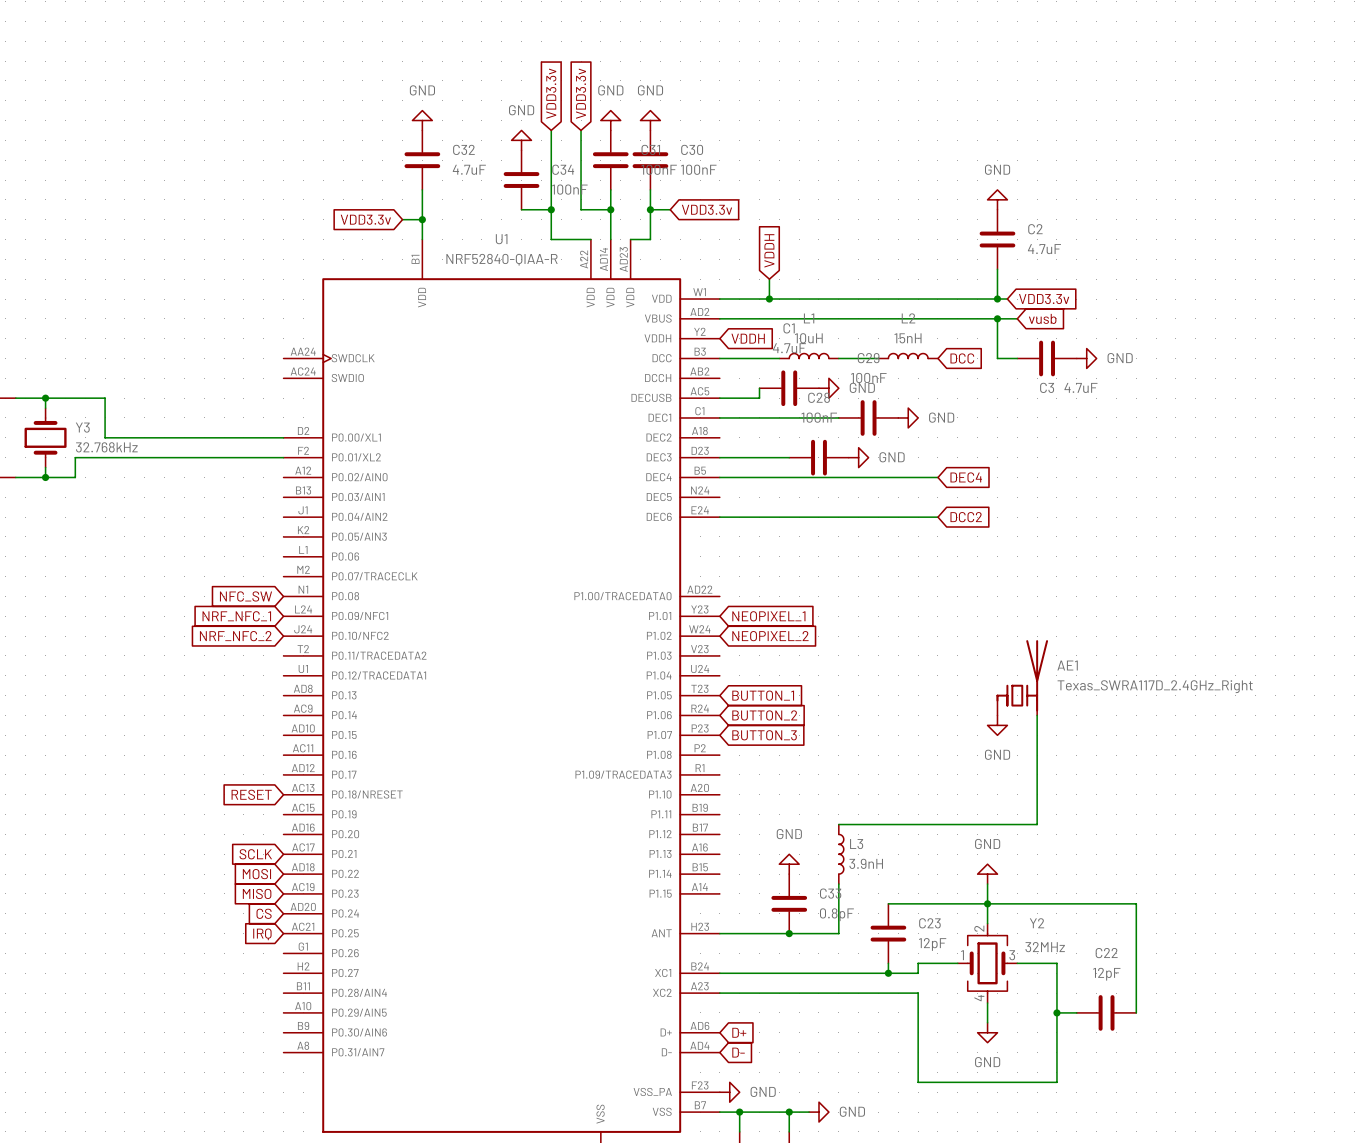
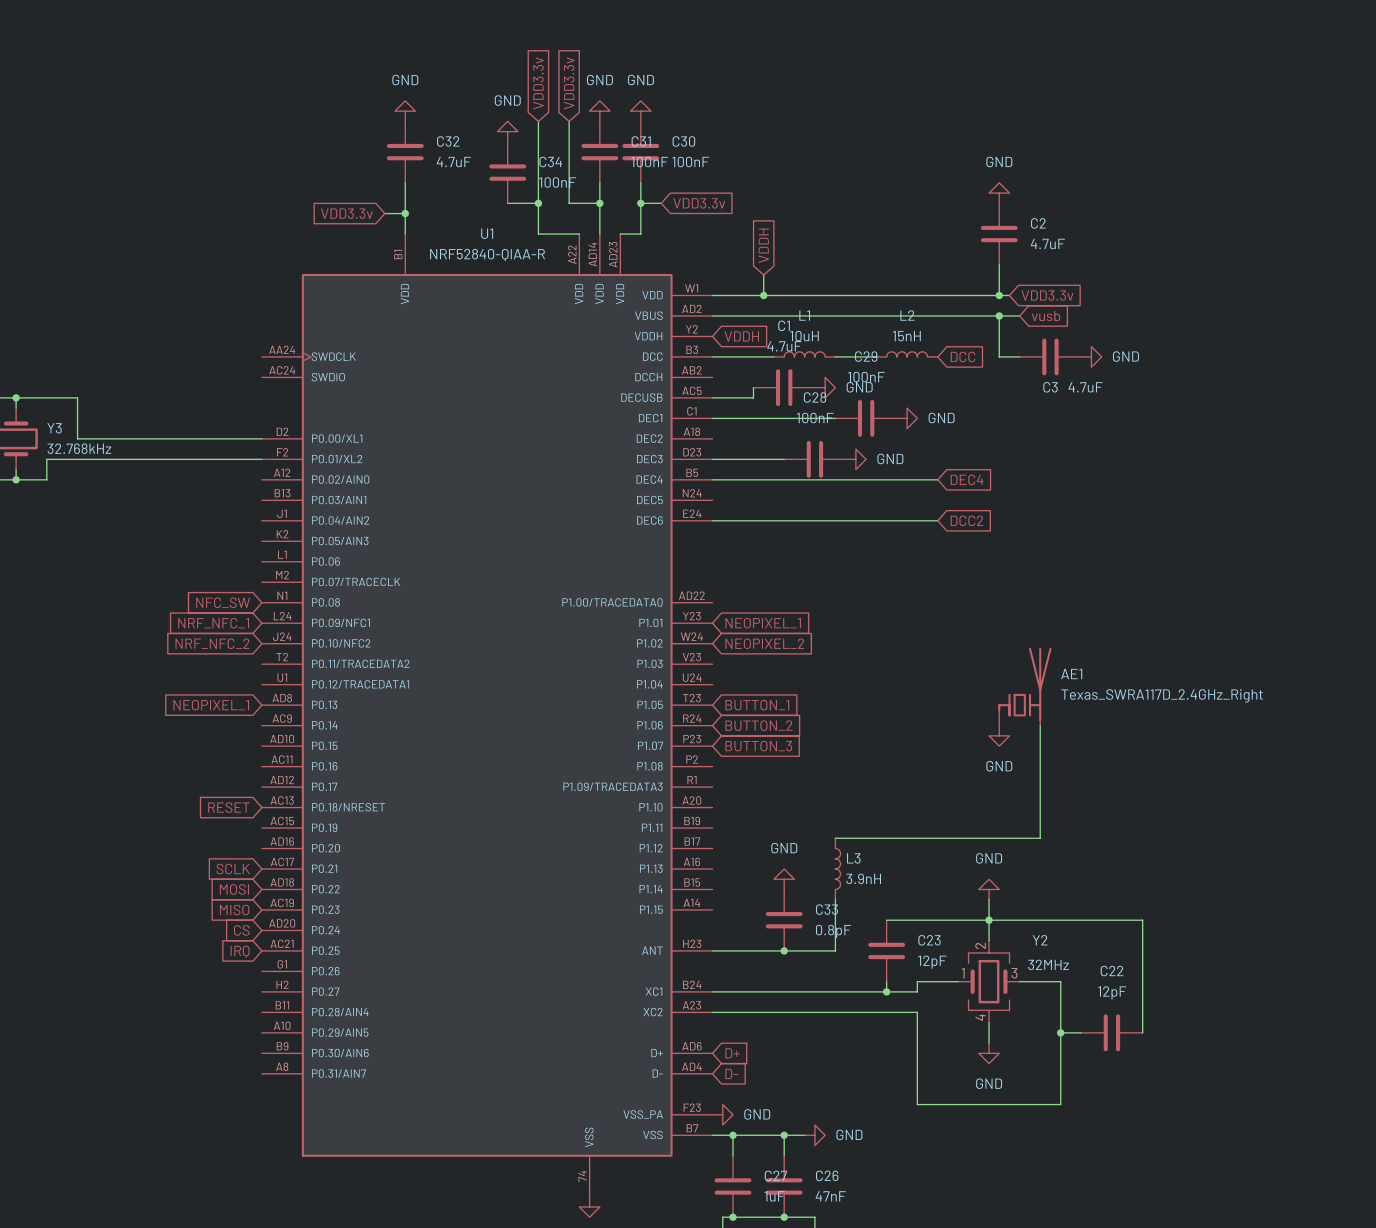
global label: none -> NEOPIXEL_1 (211, 705)

